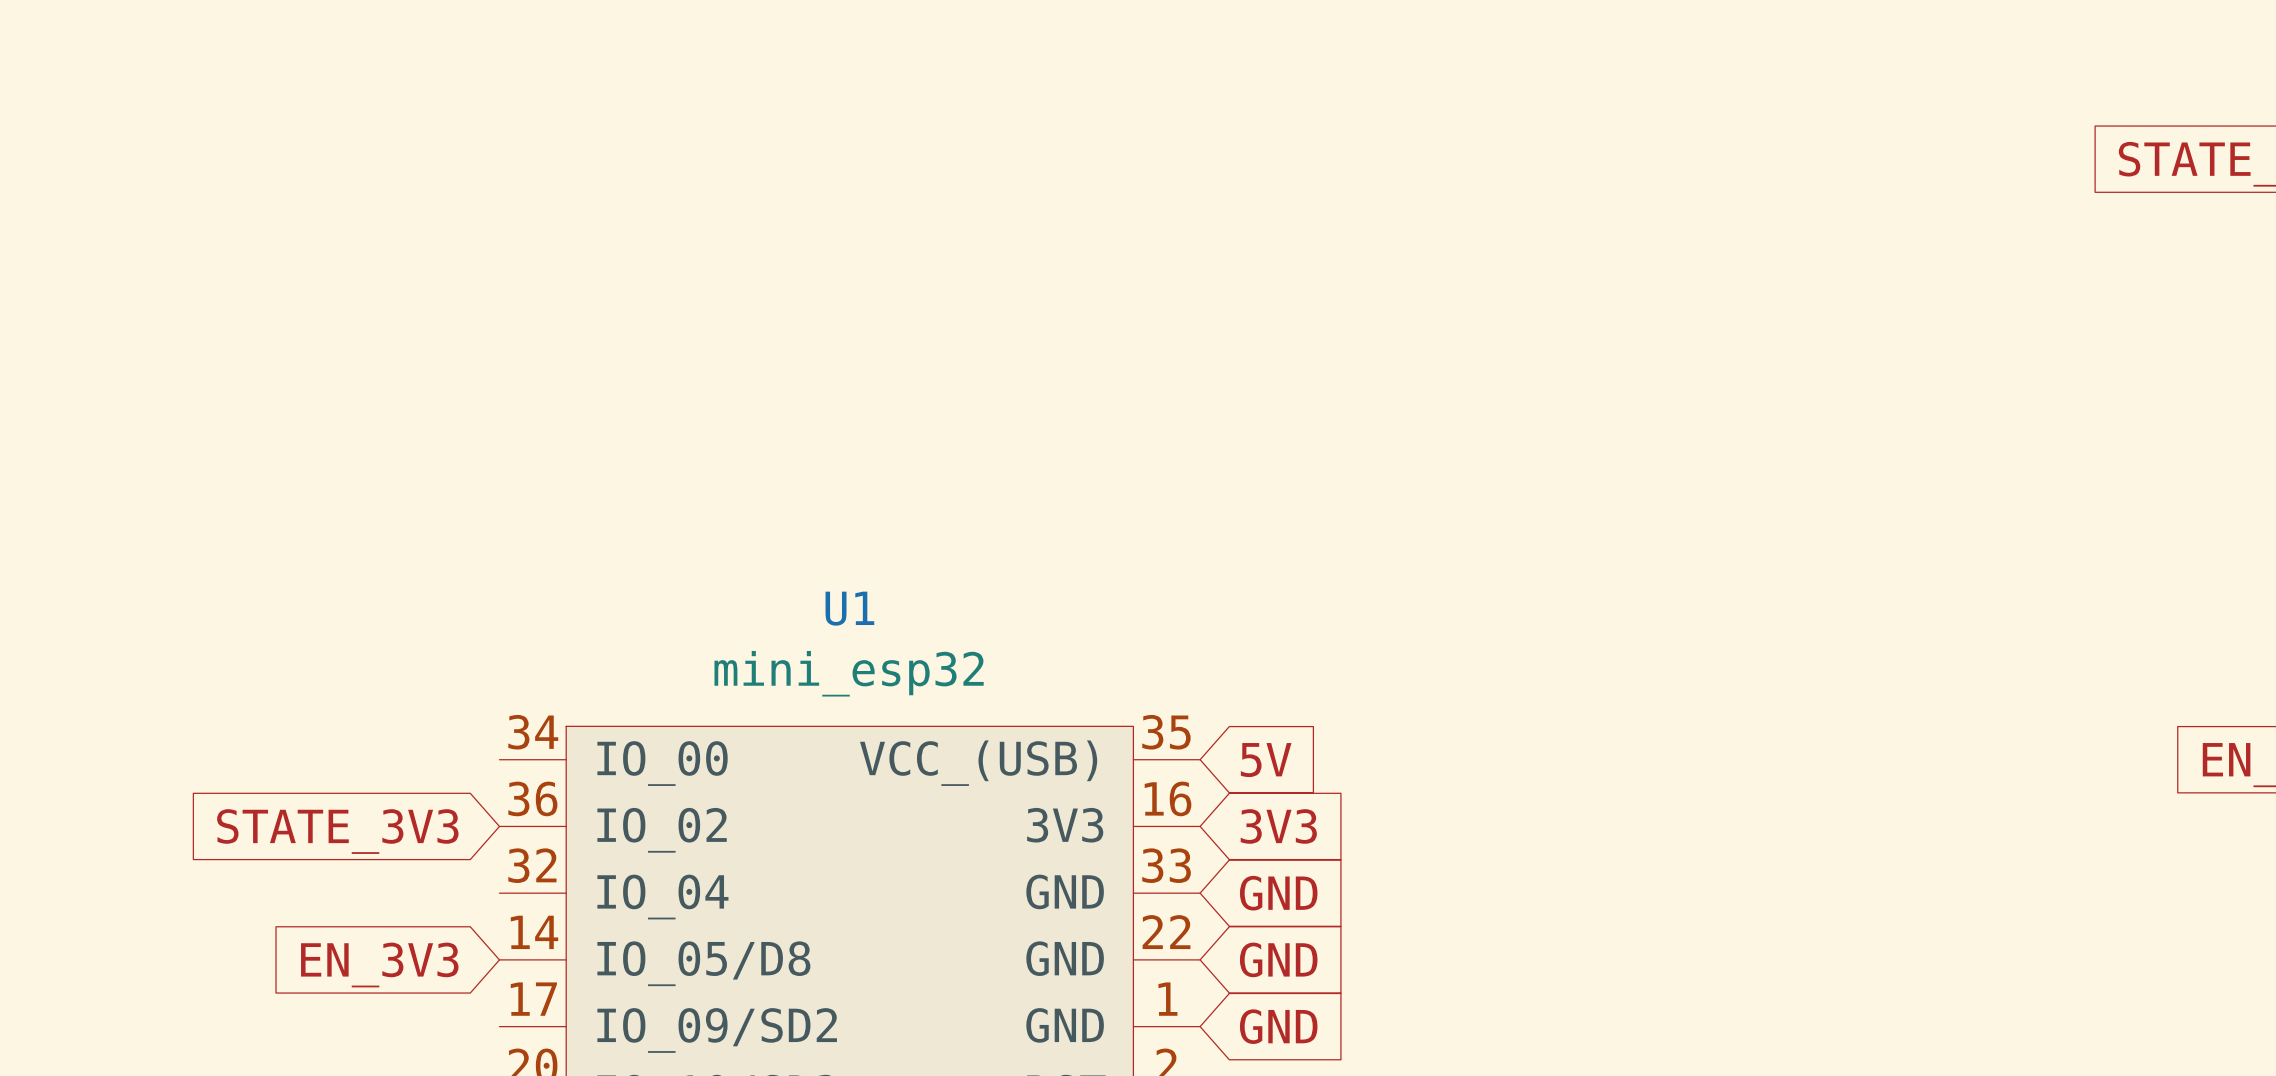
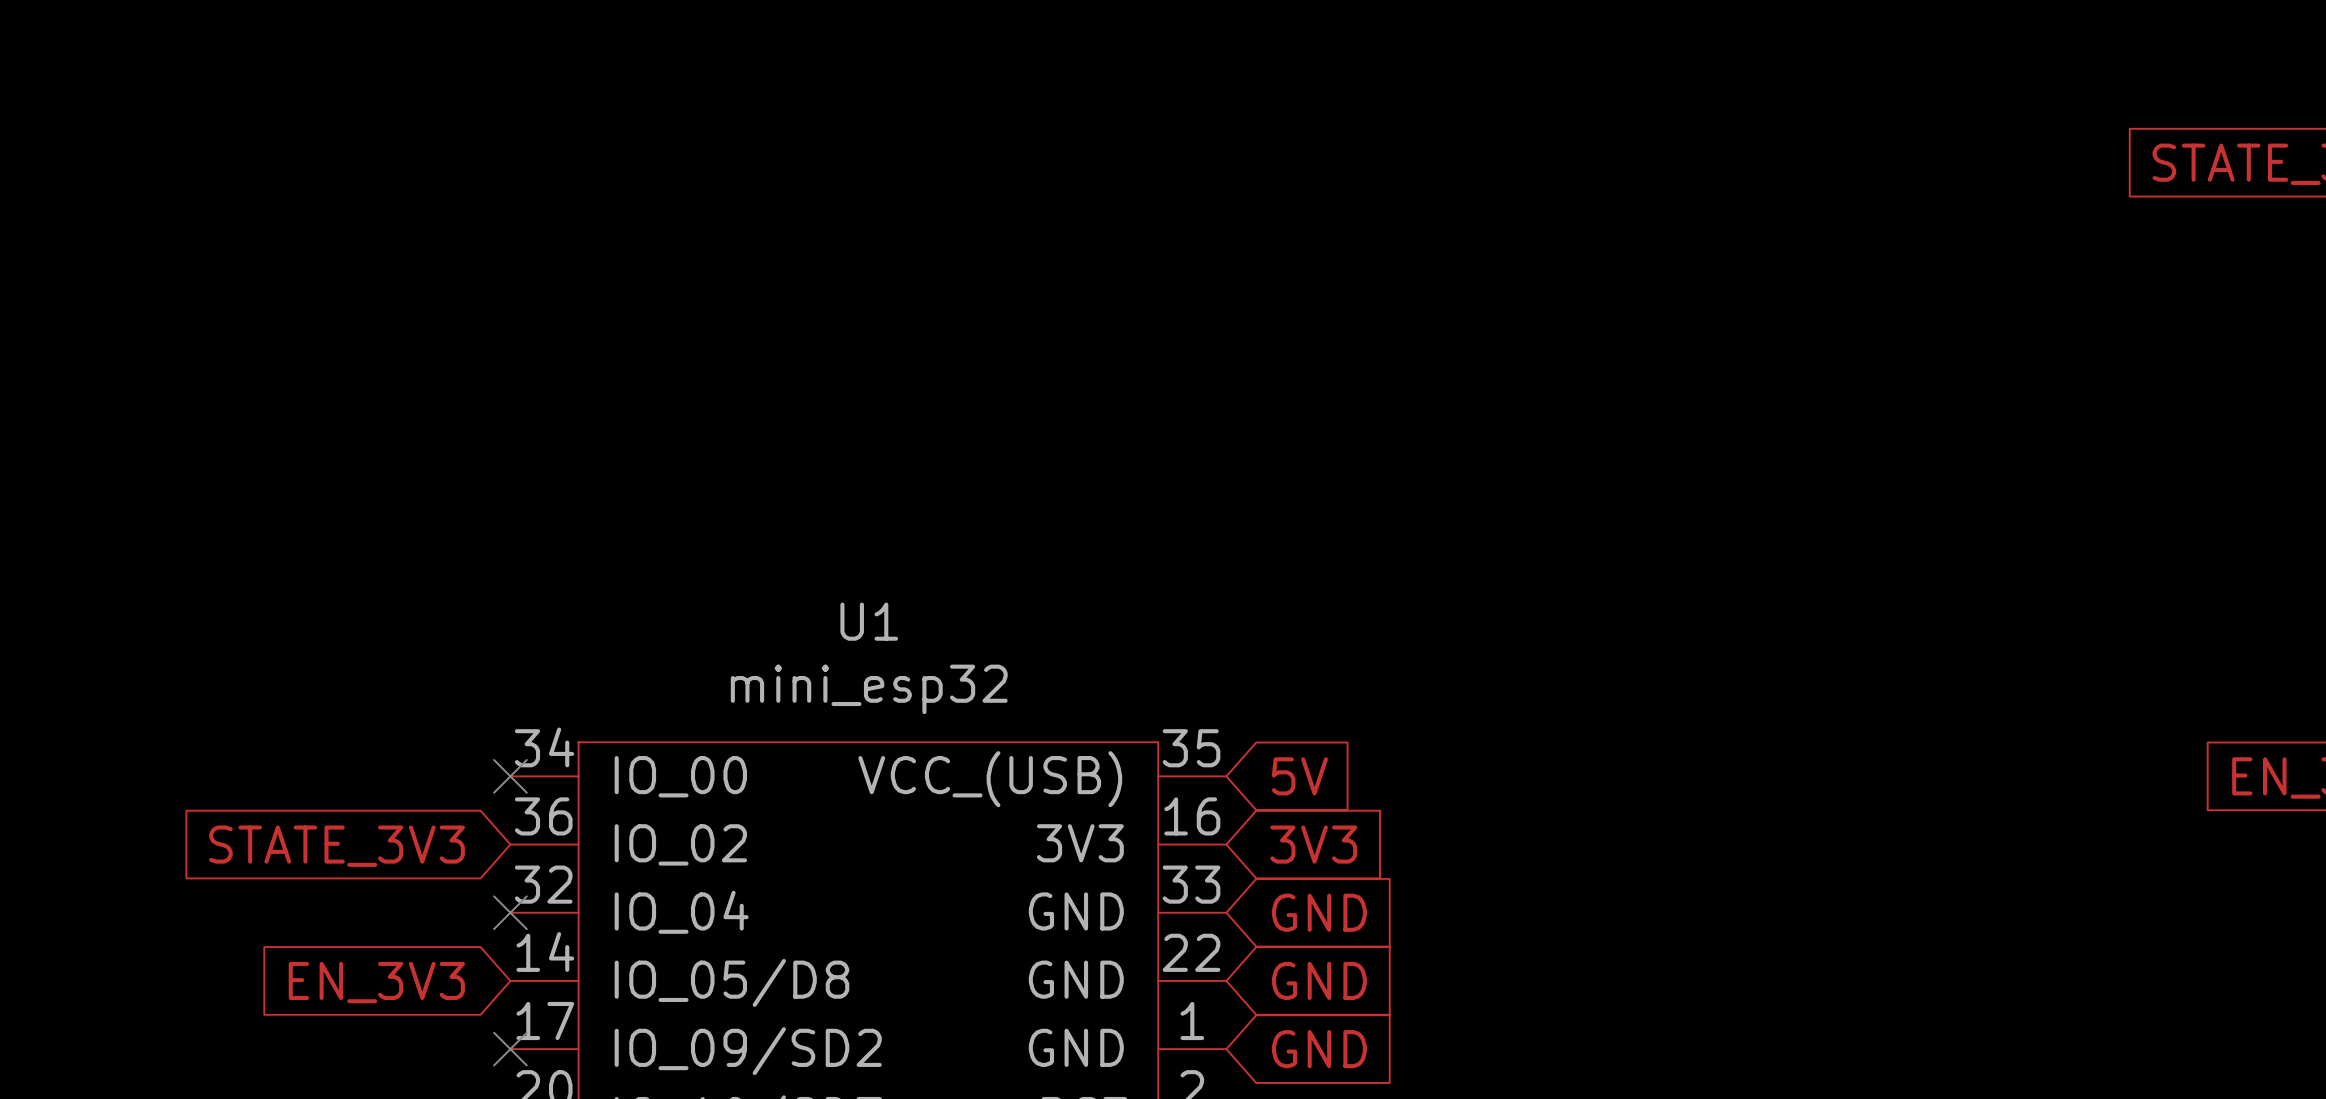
no-connect mark: none -> (510, 776)
no-connect mark: none -> (510, 912)
no-connect mark: none -> (510, 1049)

